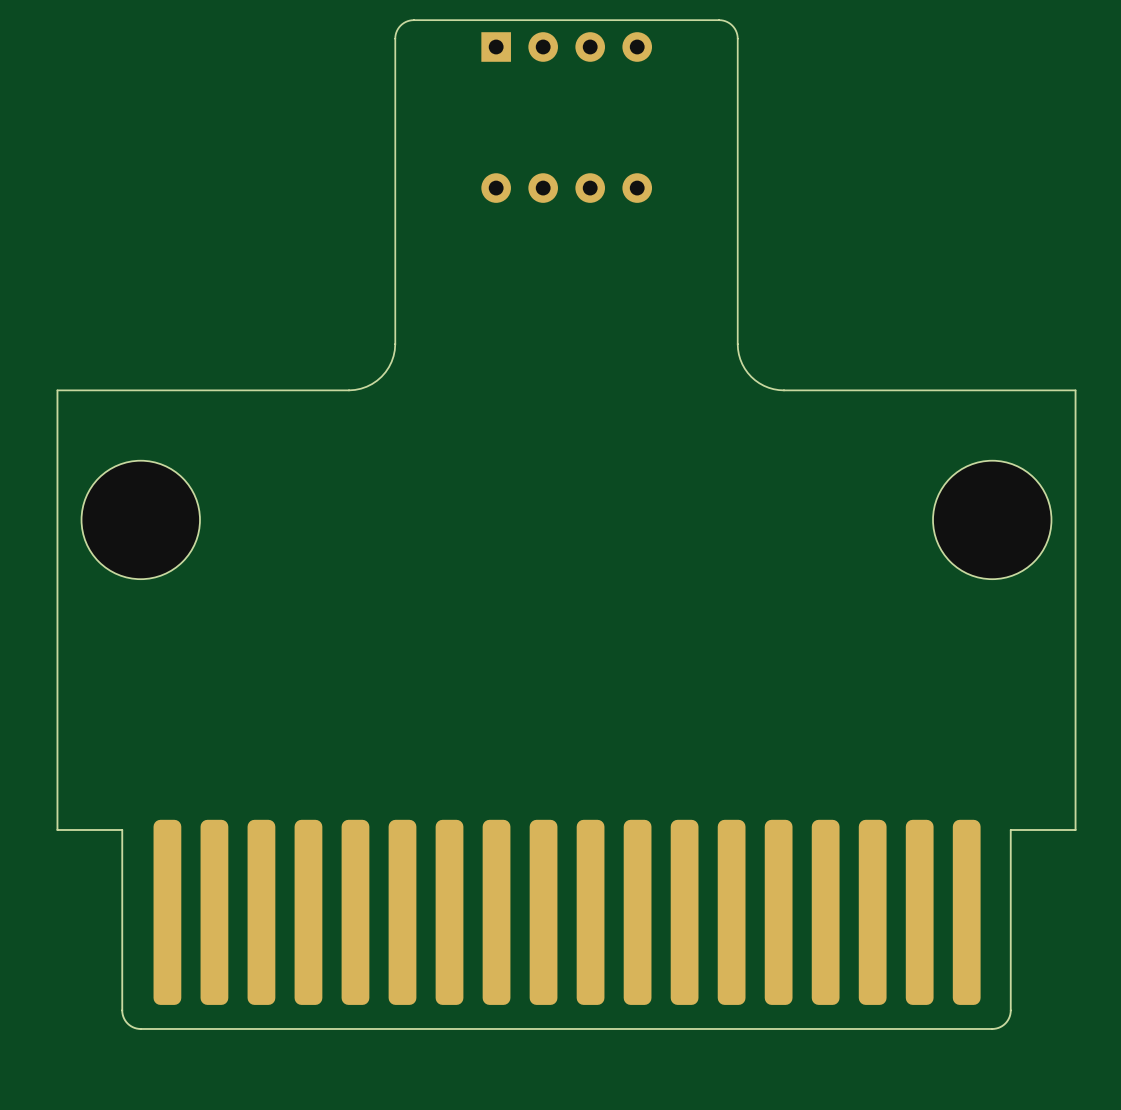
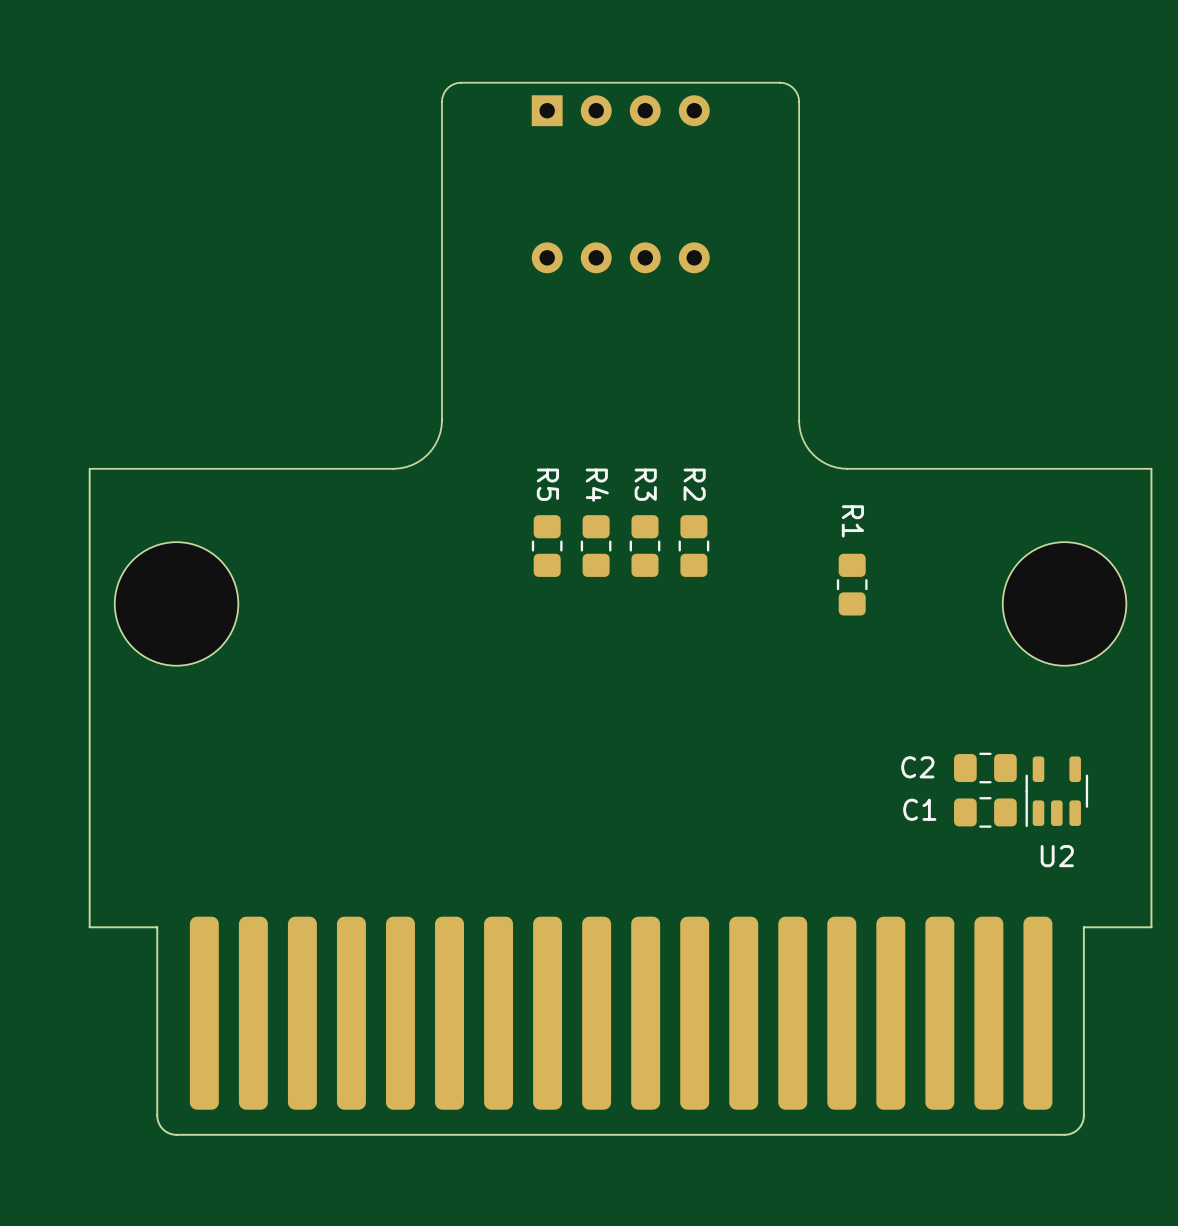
R5: none -> (547, 546)
R4: none -> (596, 546)
R3: none -> (645, 546)
R2: none -> (693, 546)
R1: none -> (852, 584)
C2: none -> (985, 768)
U2: none -> (1056, 791)
C1: none -> (985, 812)

